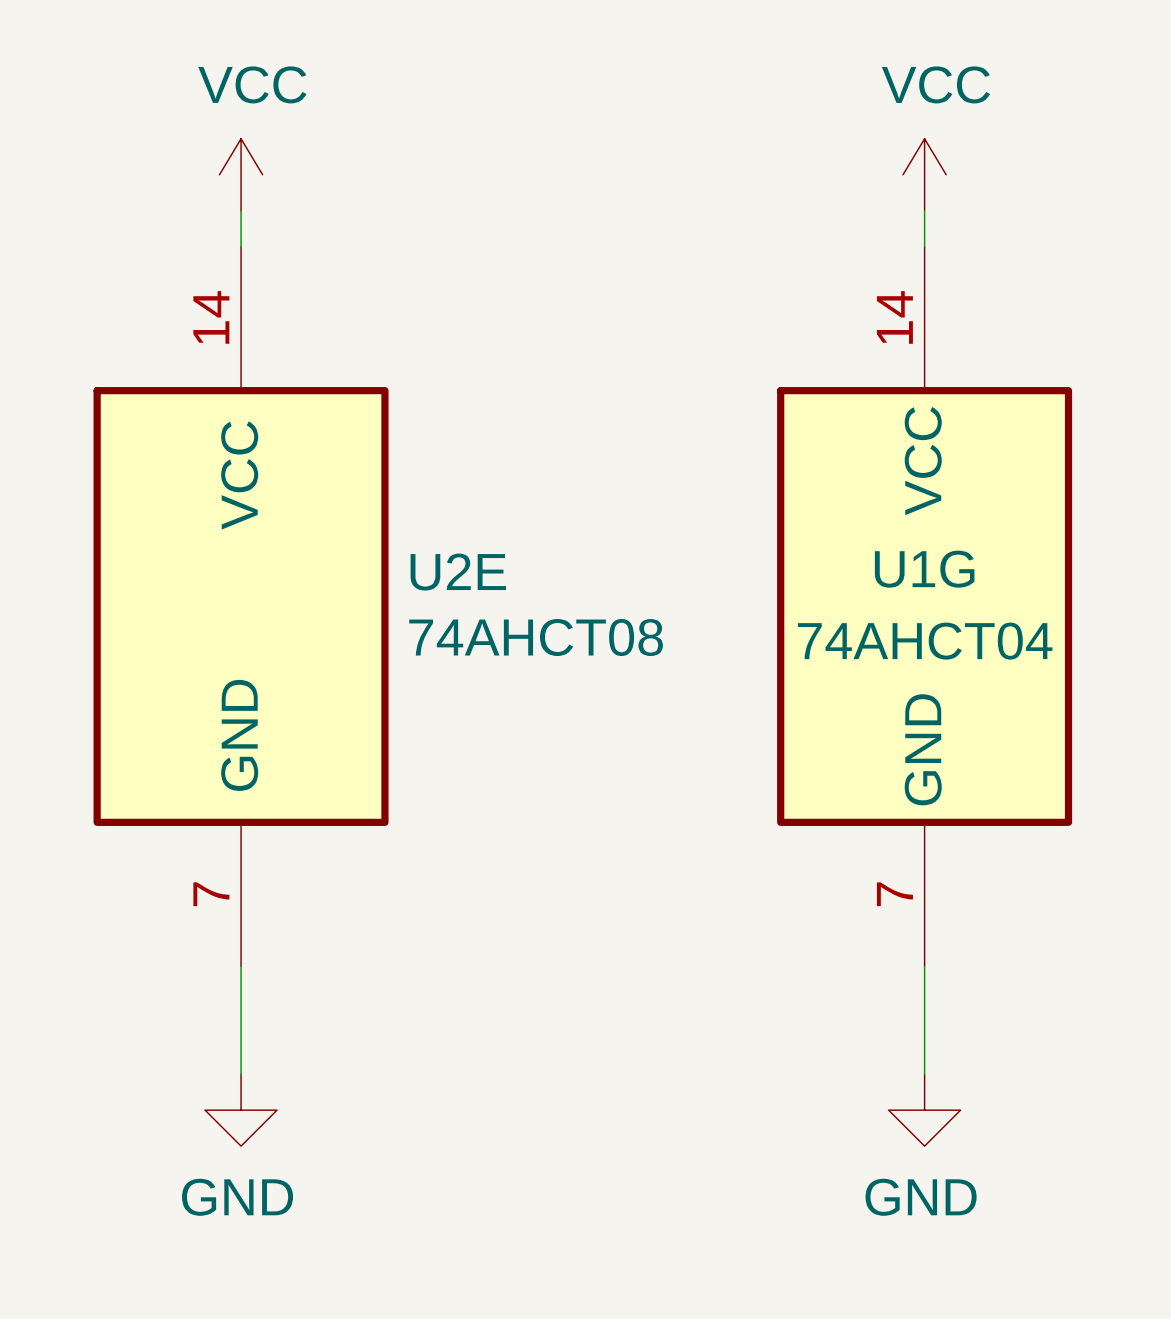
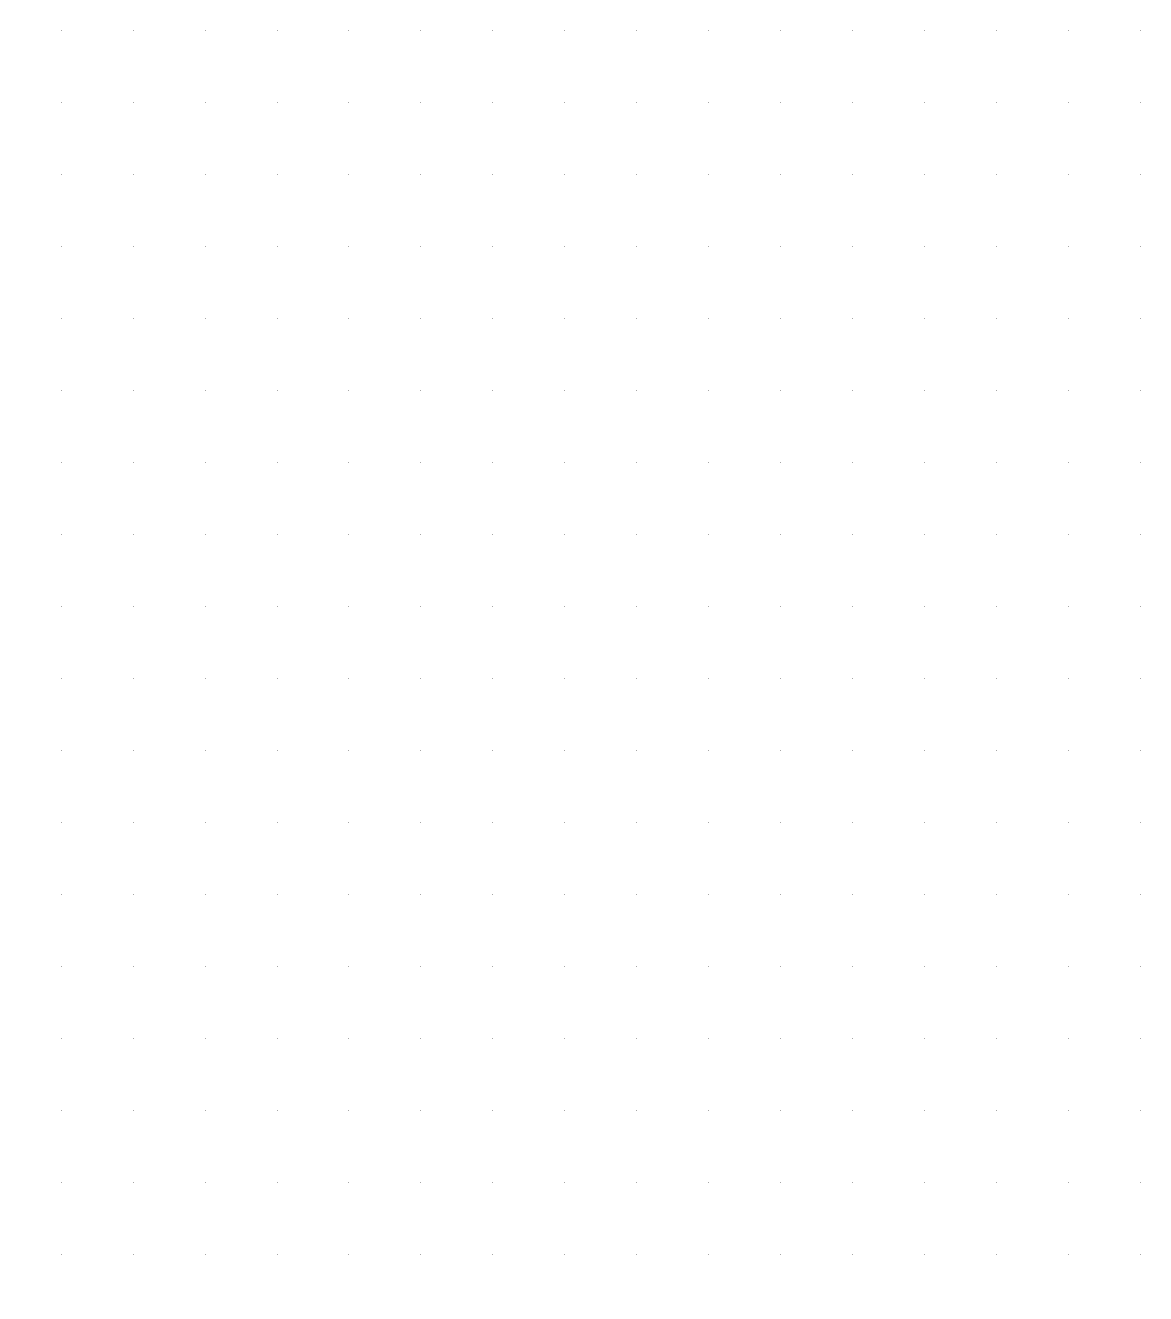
power symbol: VCC (241, 174) -> none
power symbol: VCC (924, 174) -> none
wire: (241, 210) (241, 246) -> none
wire: (924, 210) (924, 246) -> none
U2E: 74AHCT08 (241, 606) -> none
U1G: 74AHCT04 (924, 606) -> none
wire: (241, 966) (241, 1074) -> none
wire: (924, 966) (924, 1074) -> none
power symbol: GND (241, 1110) -> none
power symbol: GND (924, 1110) -> none

